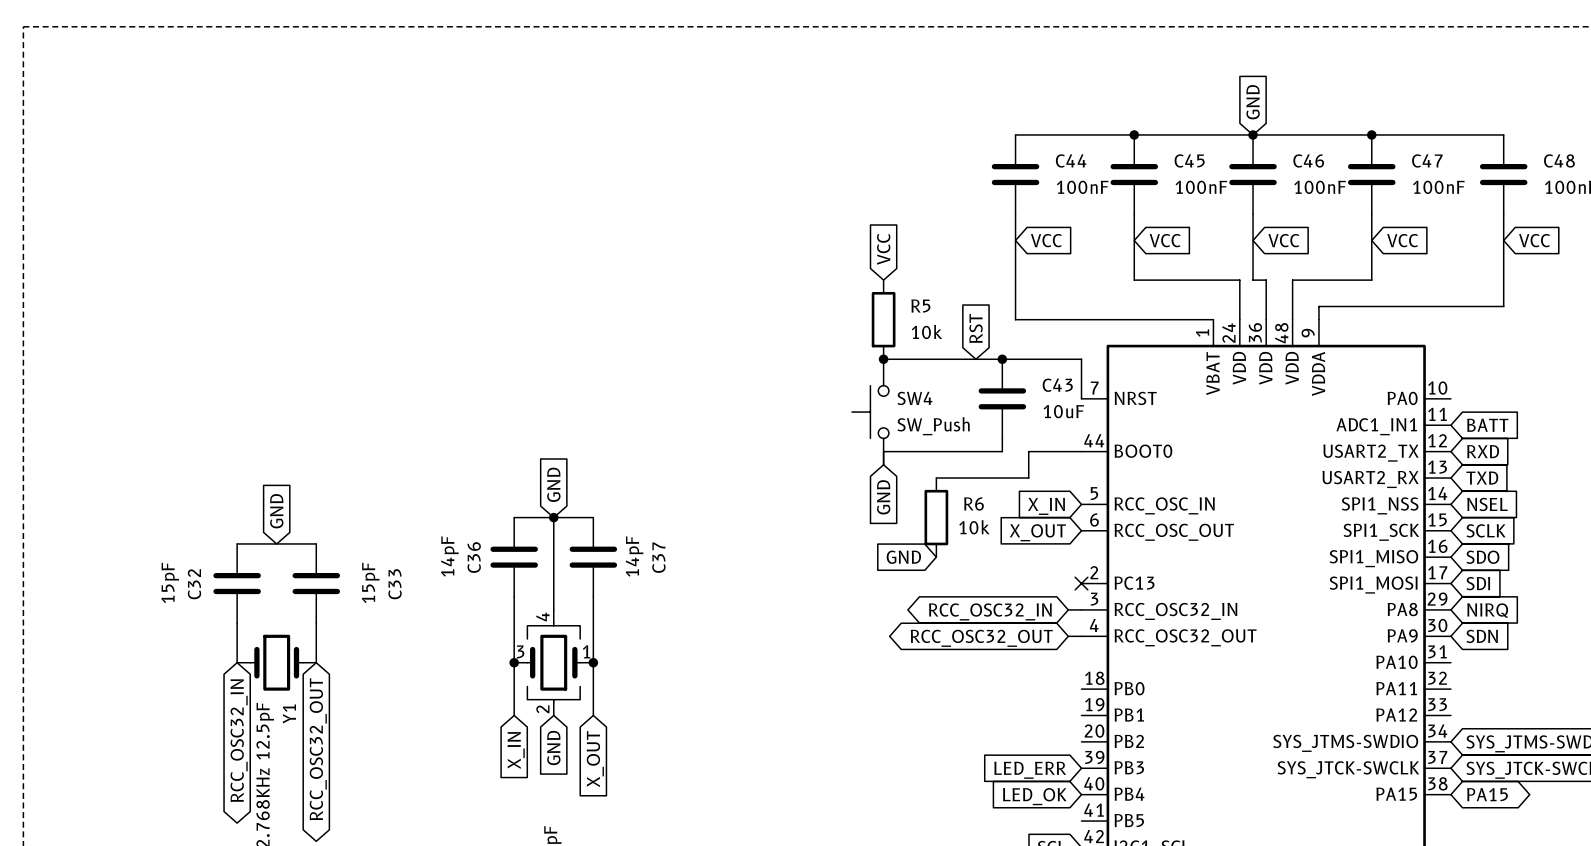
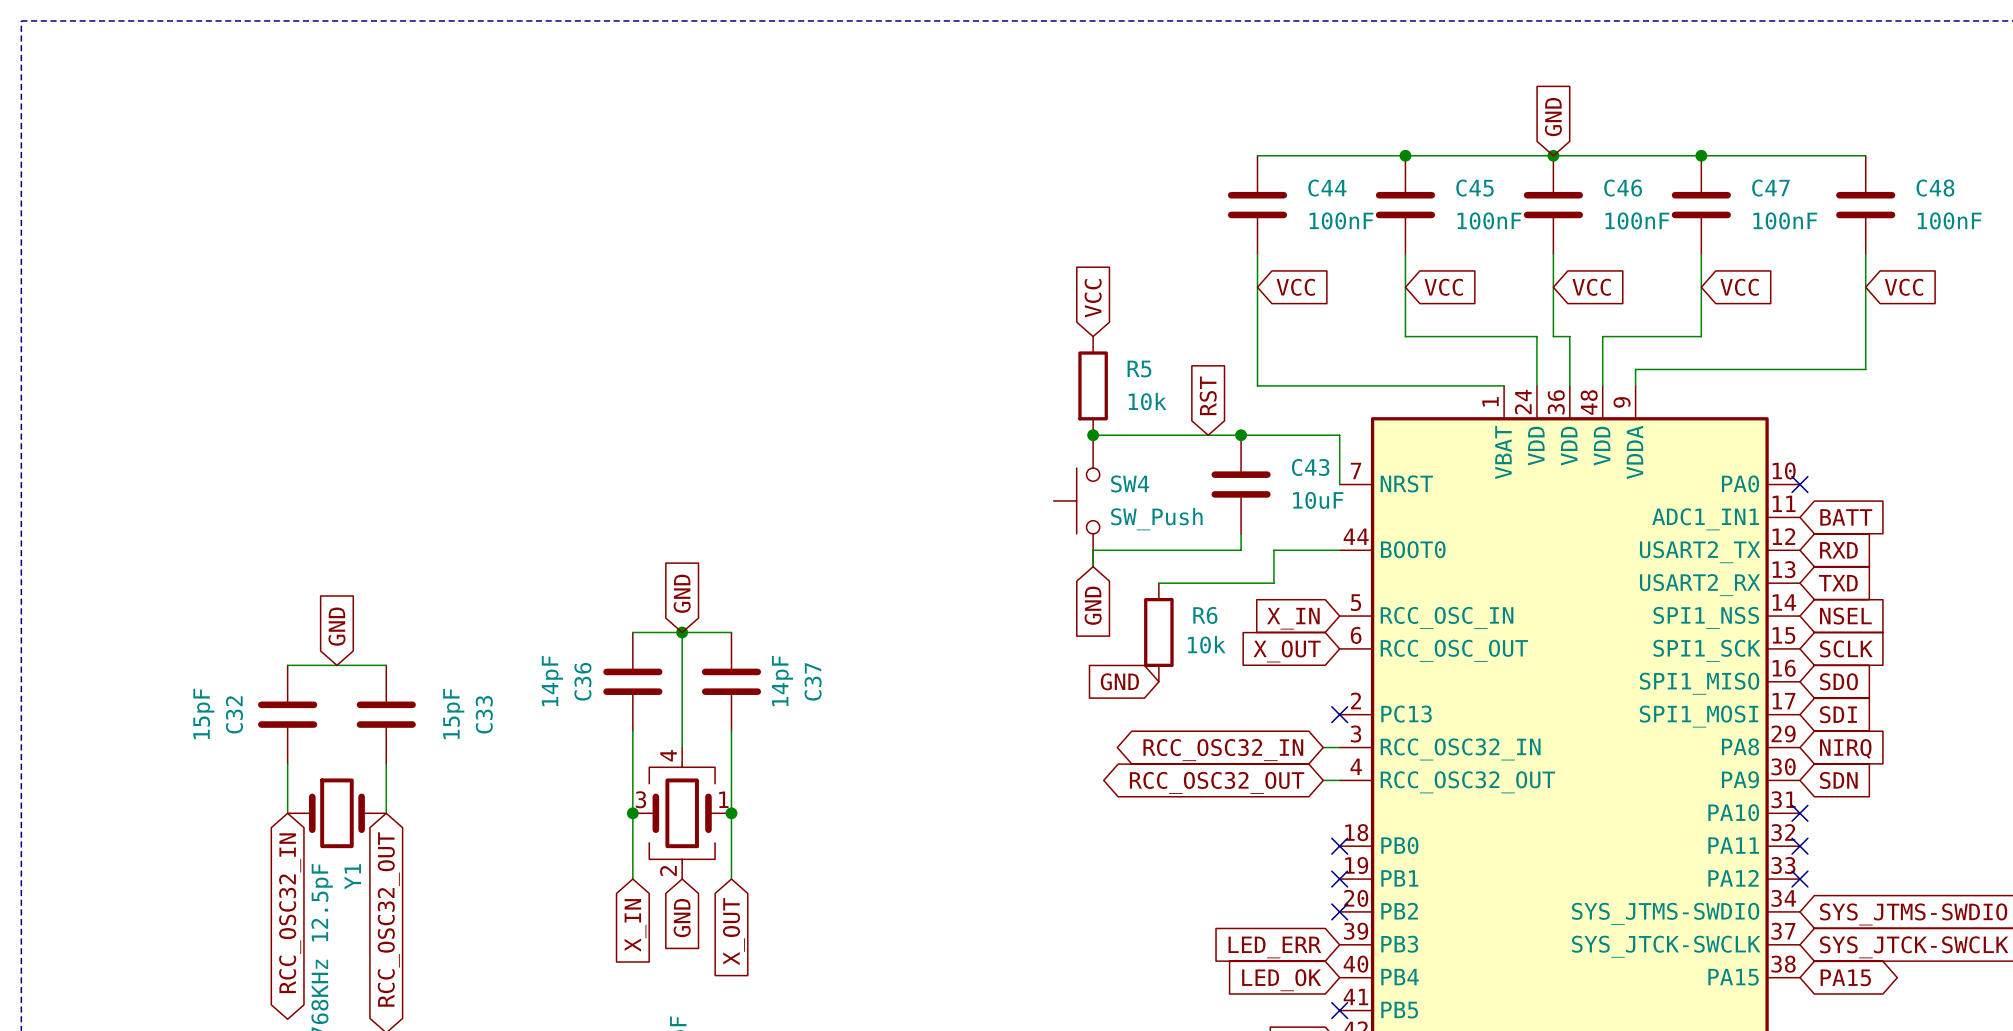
no-connect mark: none -> (1799, 484)
no-connect mark: none -> (1799, 813)
no-connect mark: none -> (1339, 846)
no-connect mark: none -> (1799, 846)
no-connect mark: none -> (1339, 879)
no-connect mark: none -> (1799, 879)
no-connect mark: none -> (1339, 911)
no-connect mark: none -> (1339, 1010)

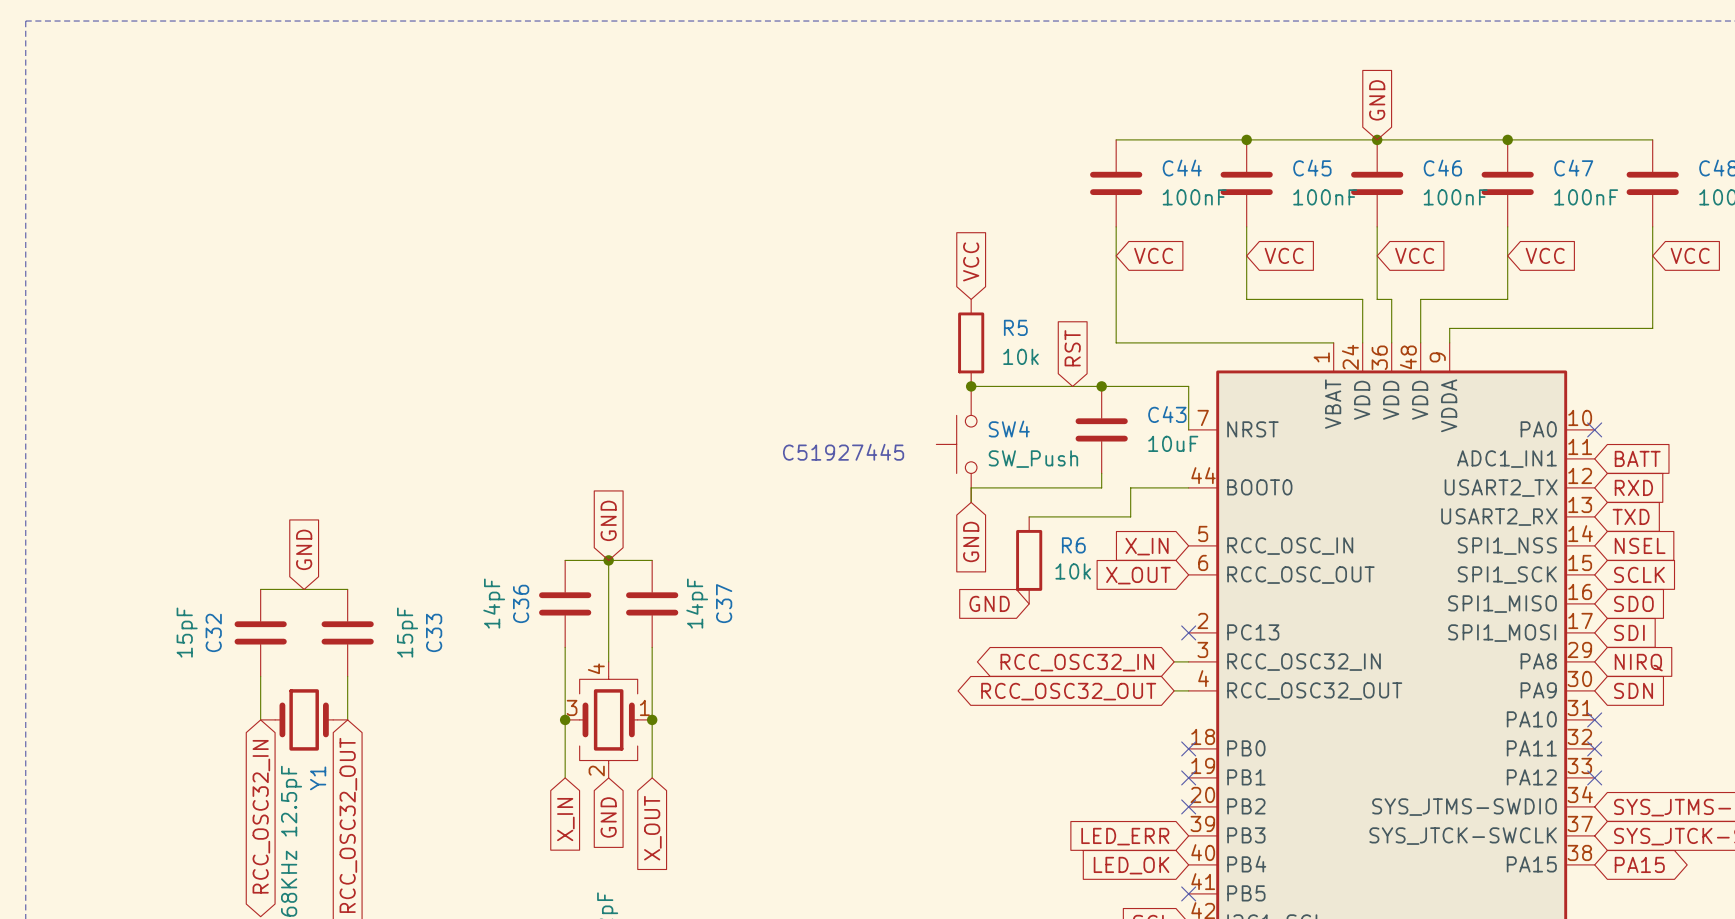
text: none -> C51927445 (843, 452)

